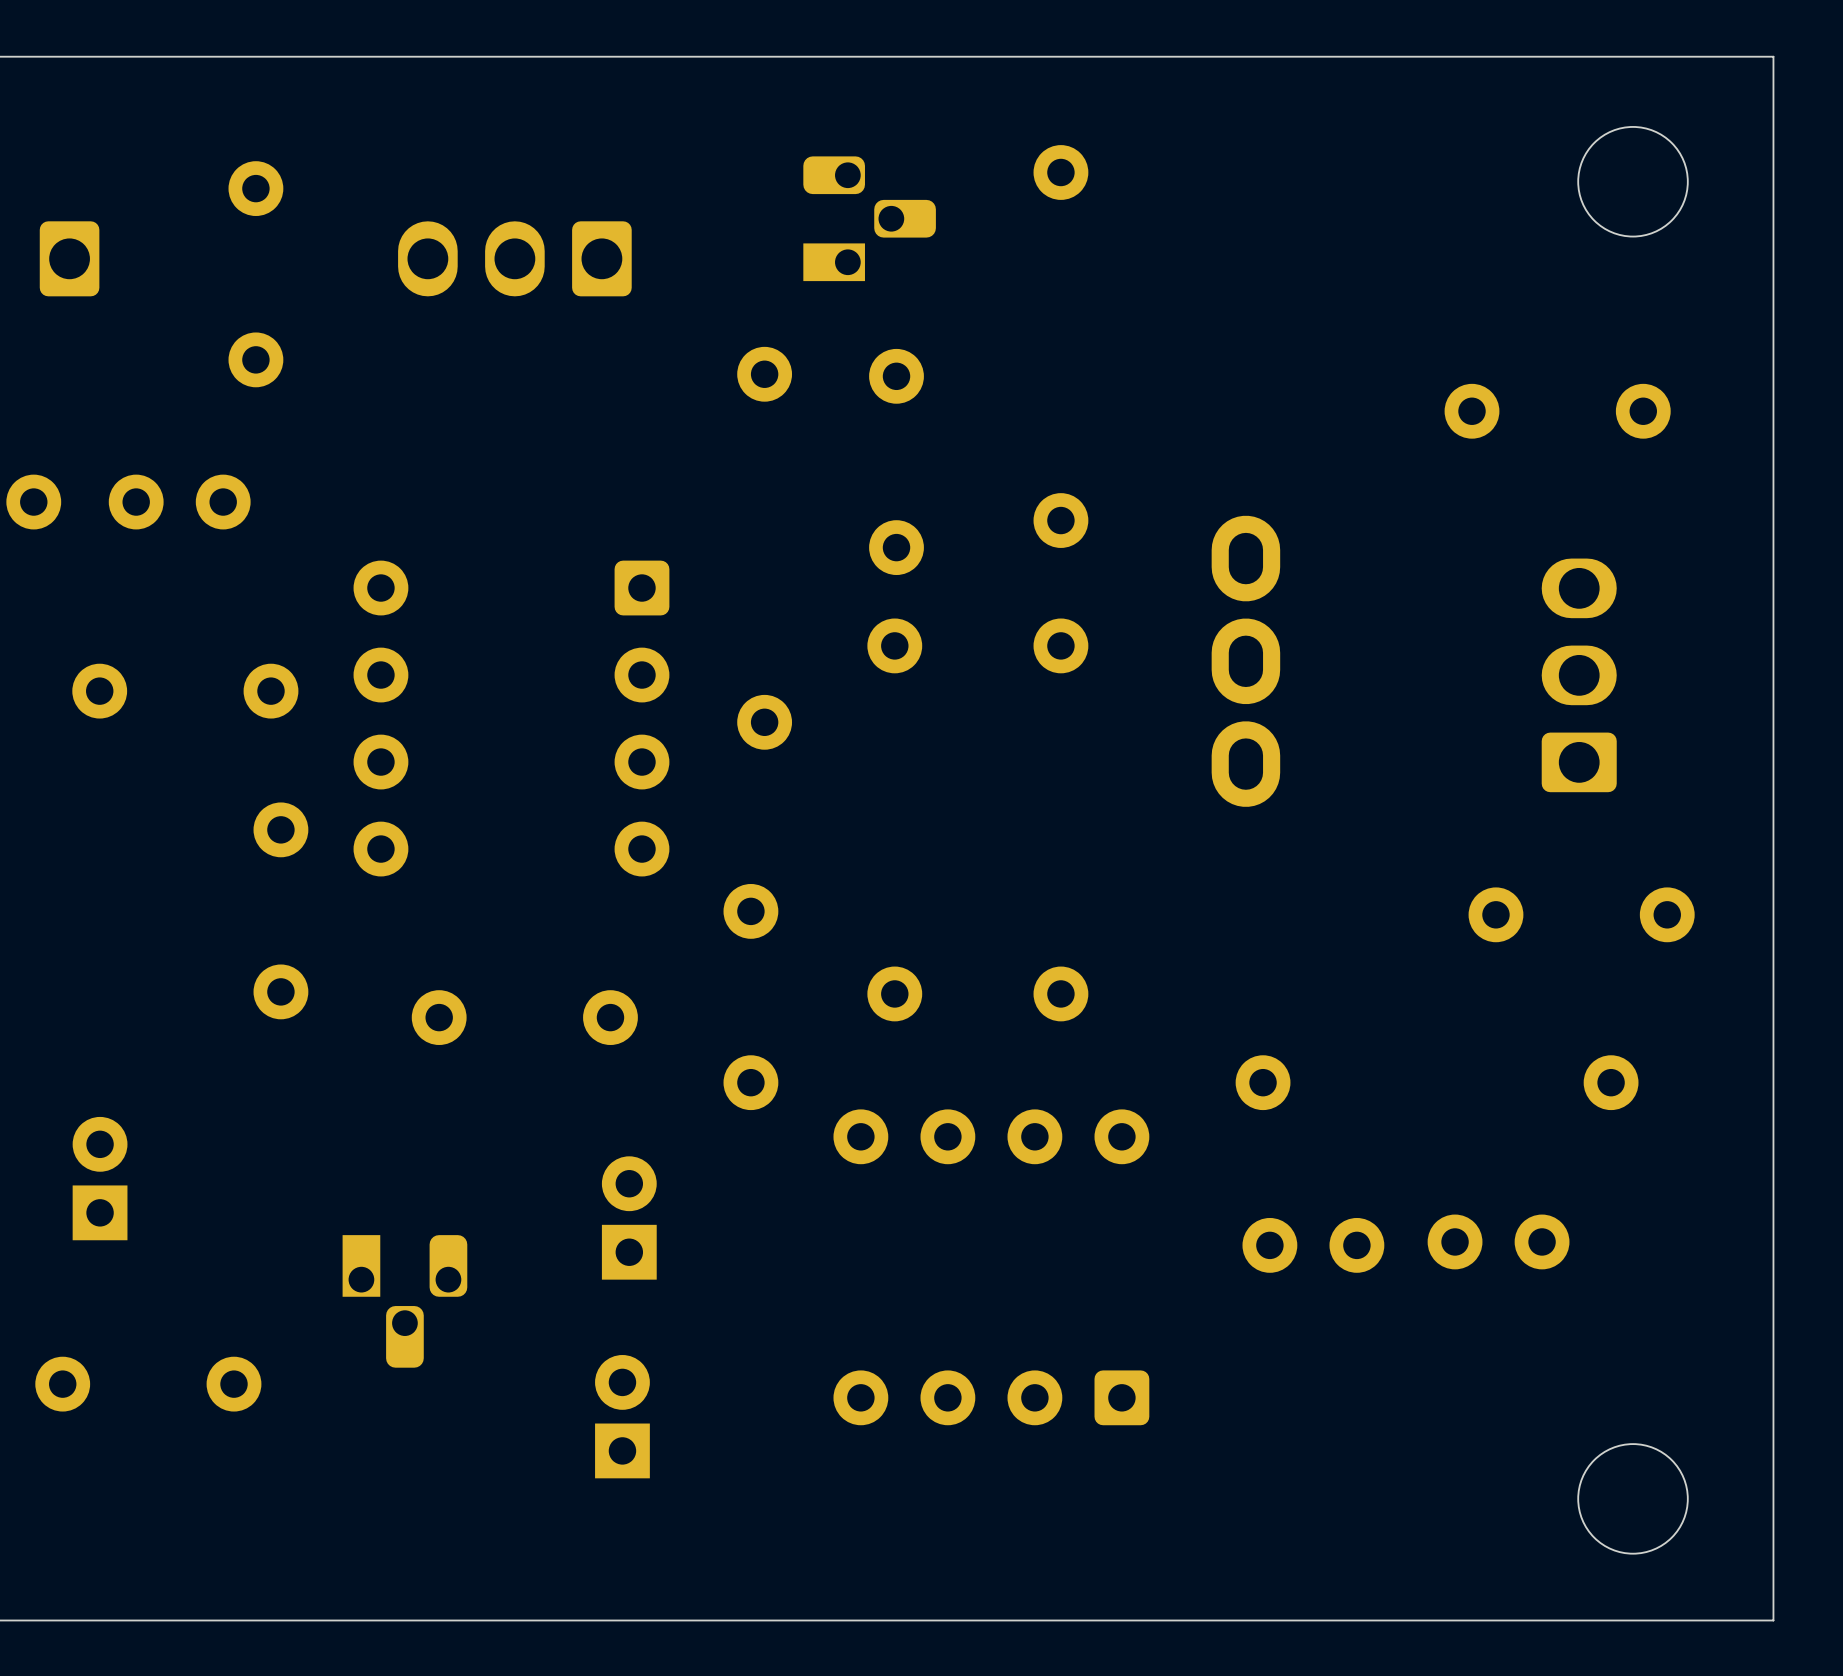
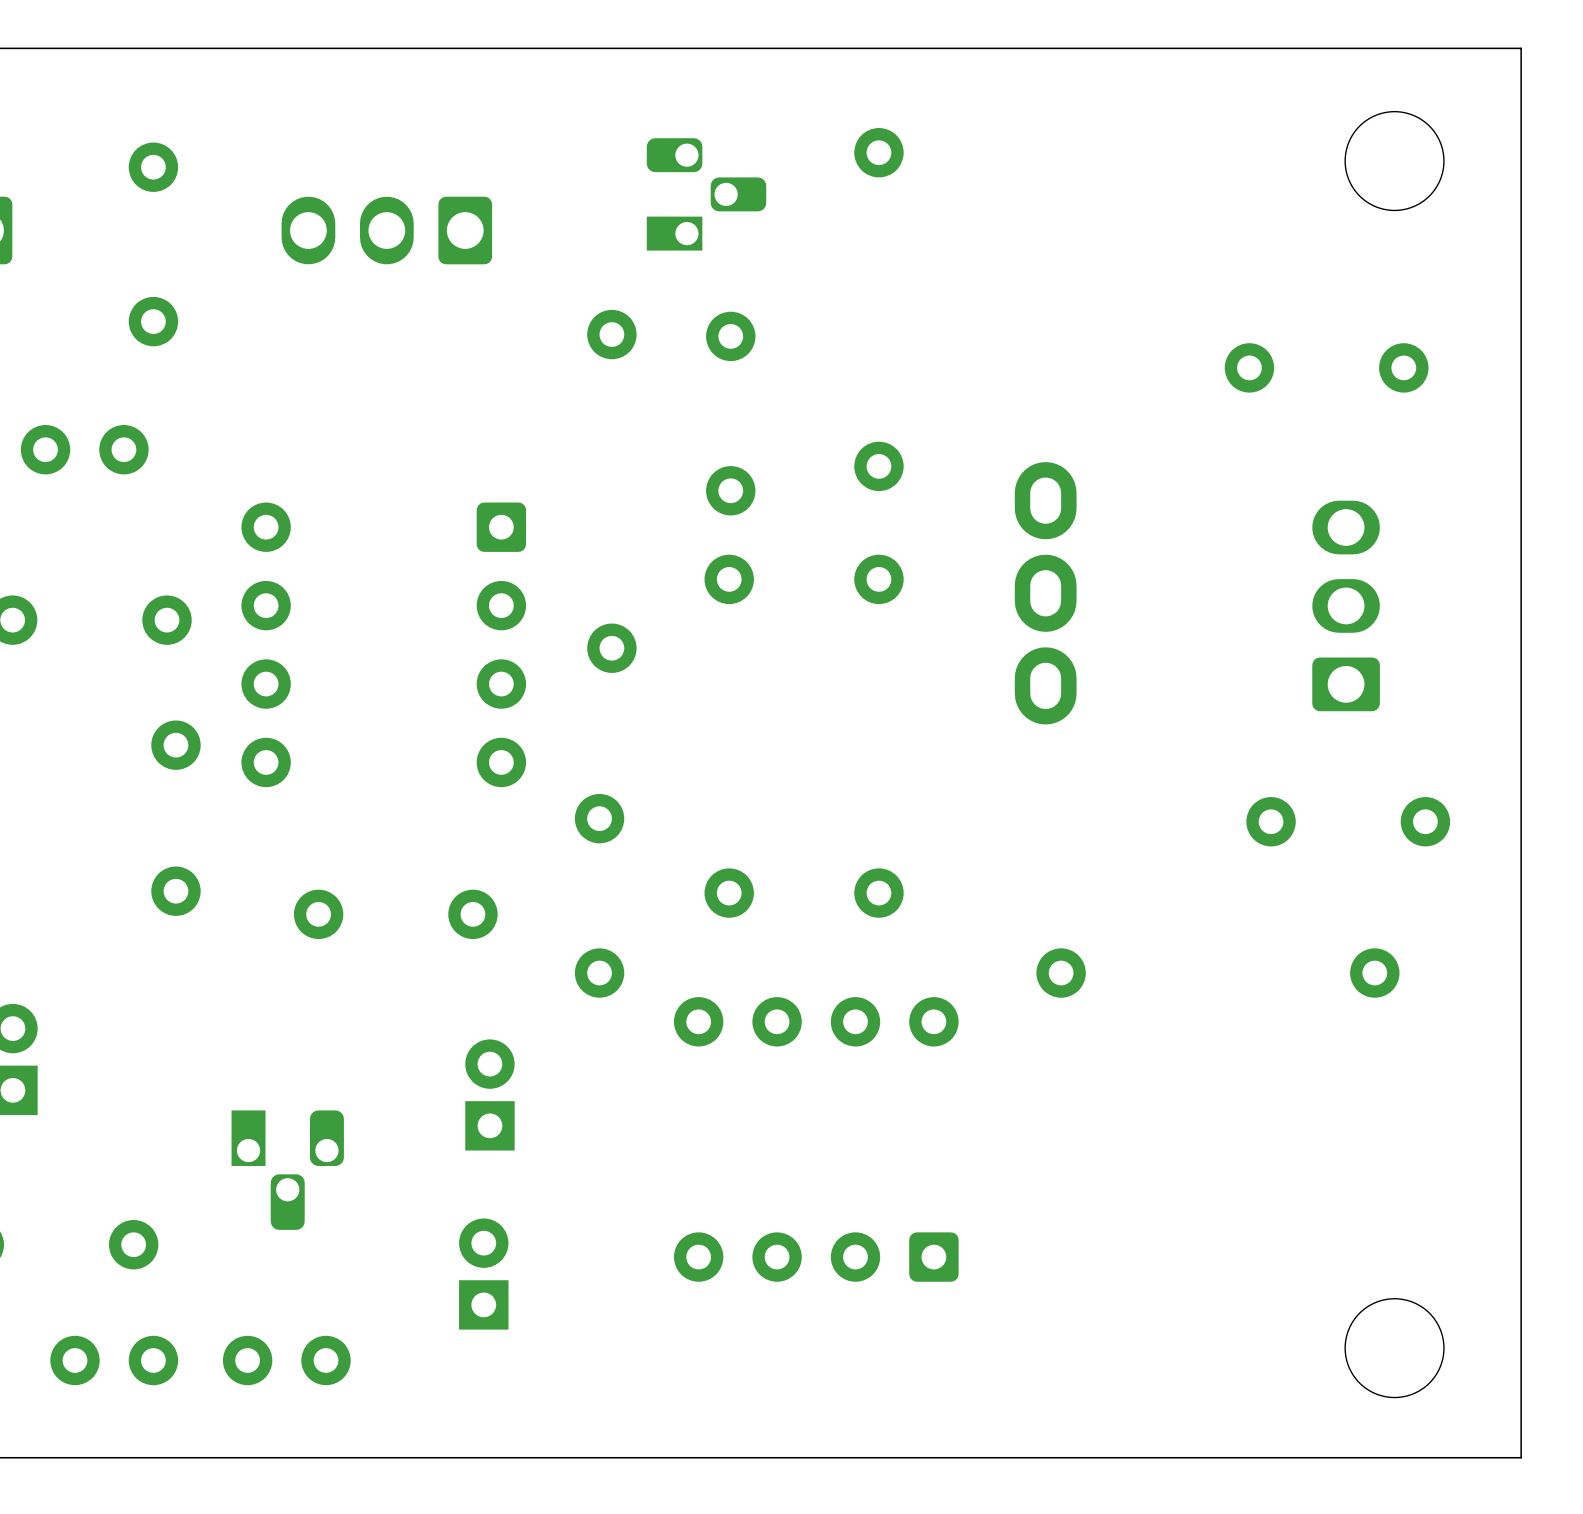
part: (1498, 1241) -> none
part: (1313, 1245) -> none
part: none -> (114, 1360)
part: none -> (286, 1360)

